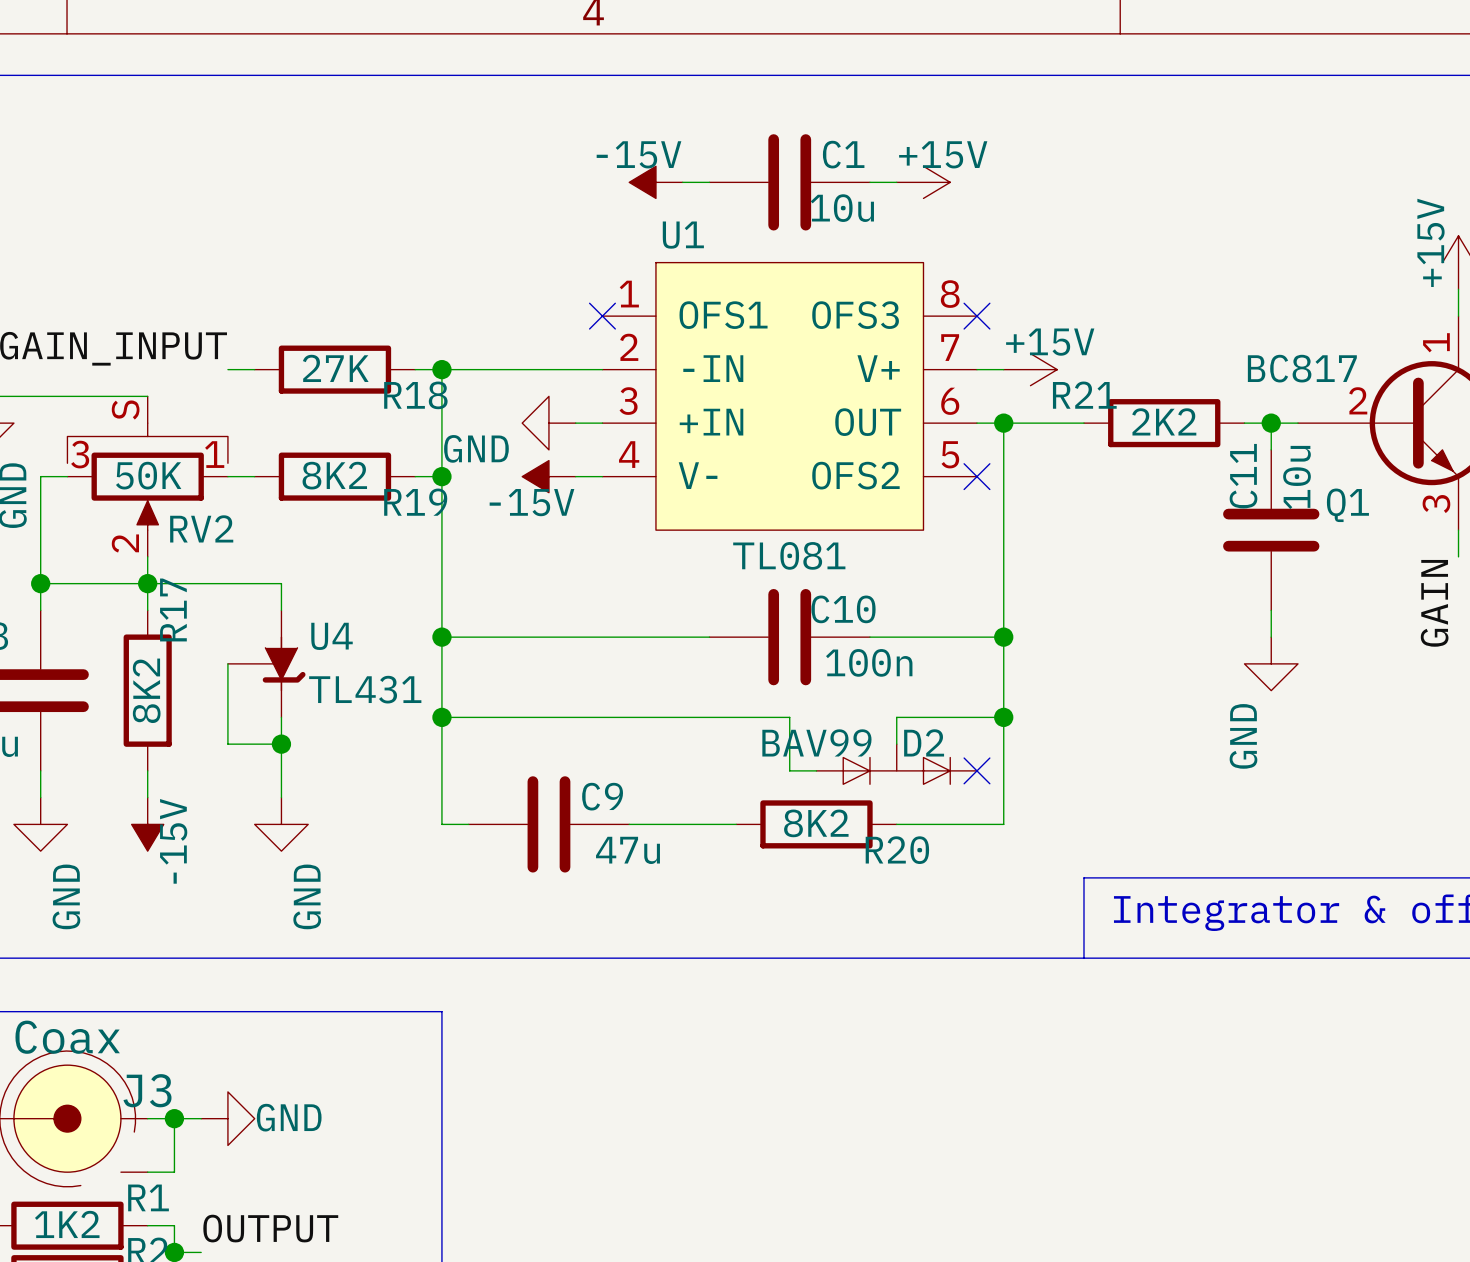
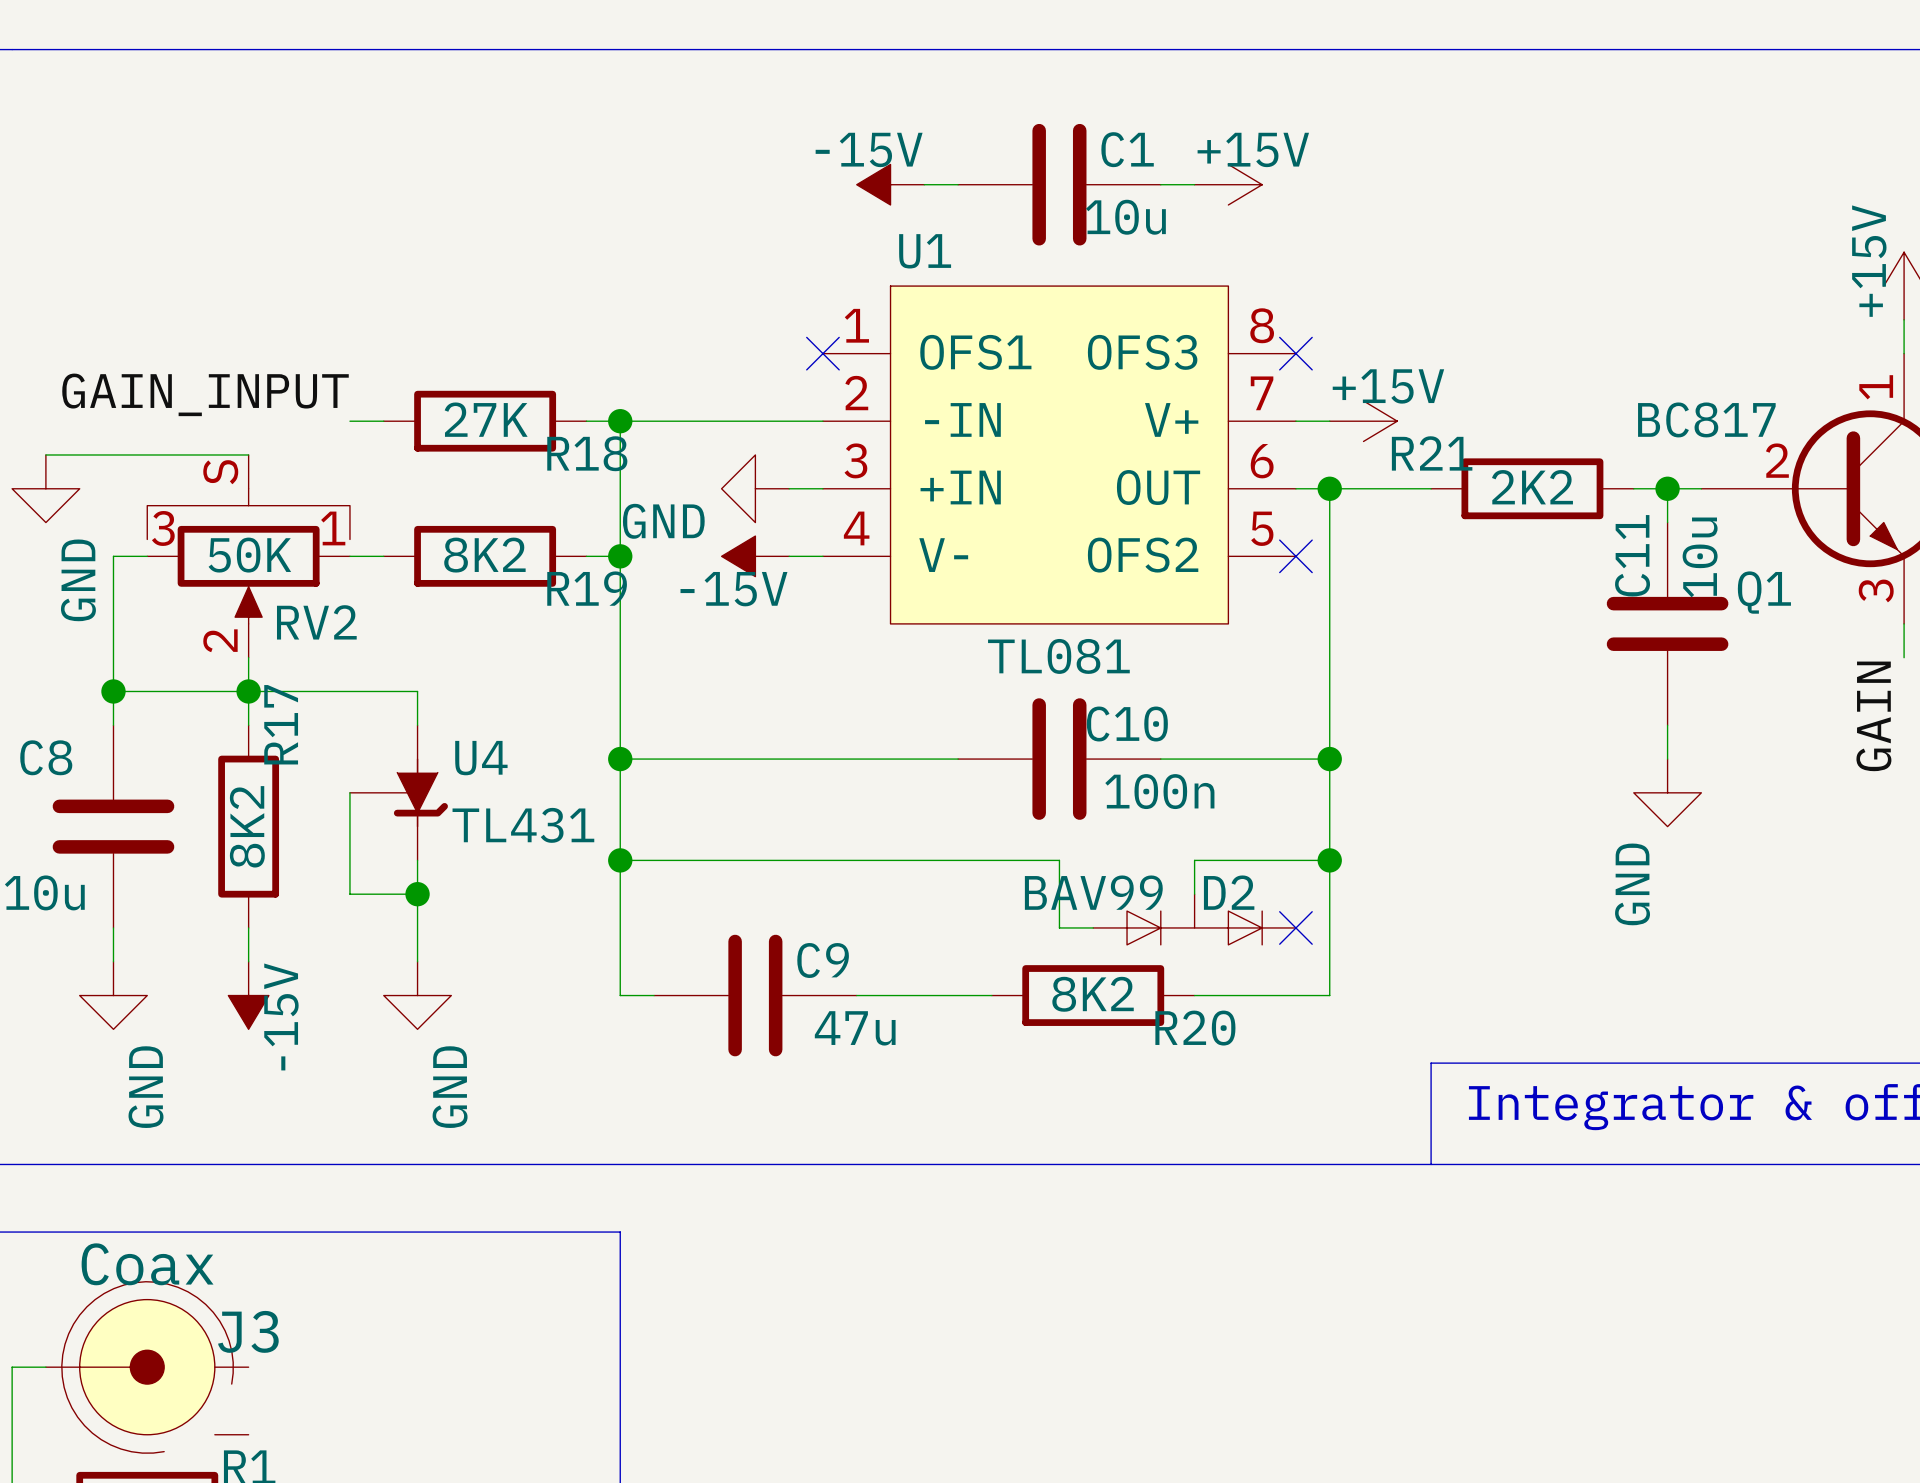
wire: (147, 1118) (201, 1118) -> none
wire: (174, 1118) (174, 1172) (147, 1172) -> none
junction: (174, 1118) -> none
power symbol: GND (227, 1118) -> none

